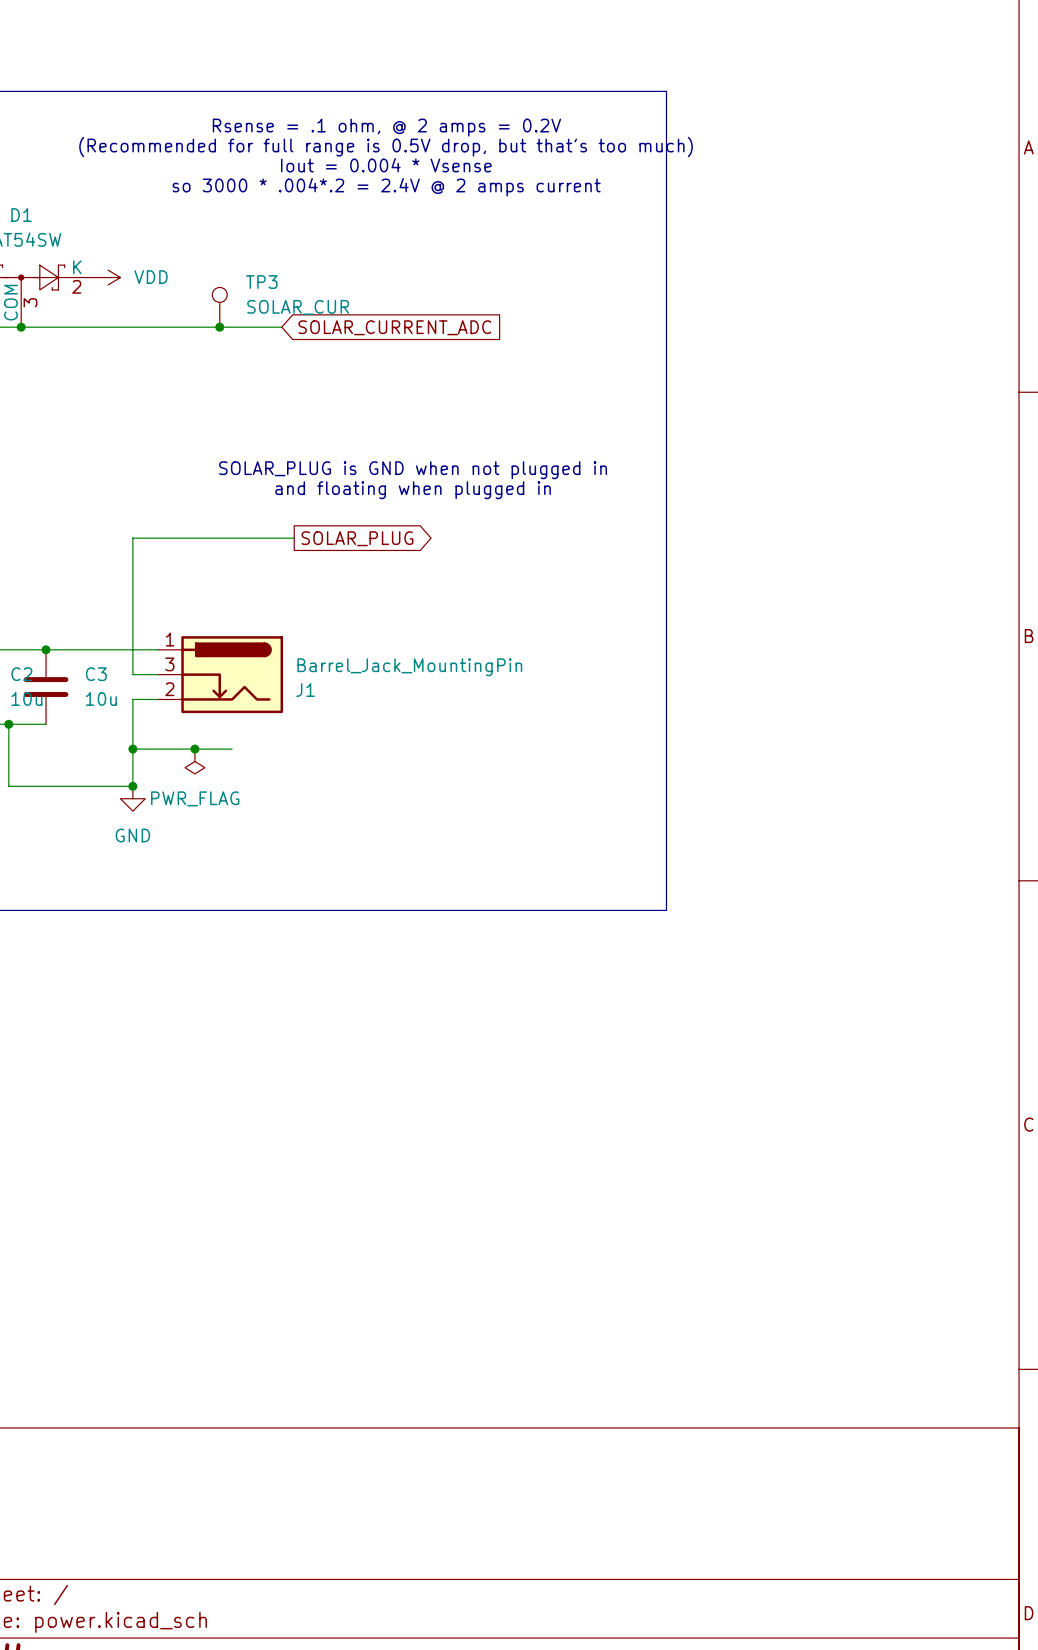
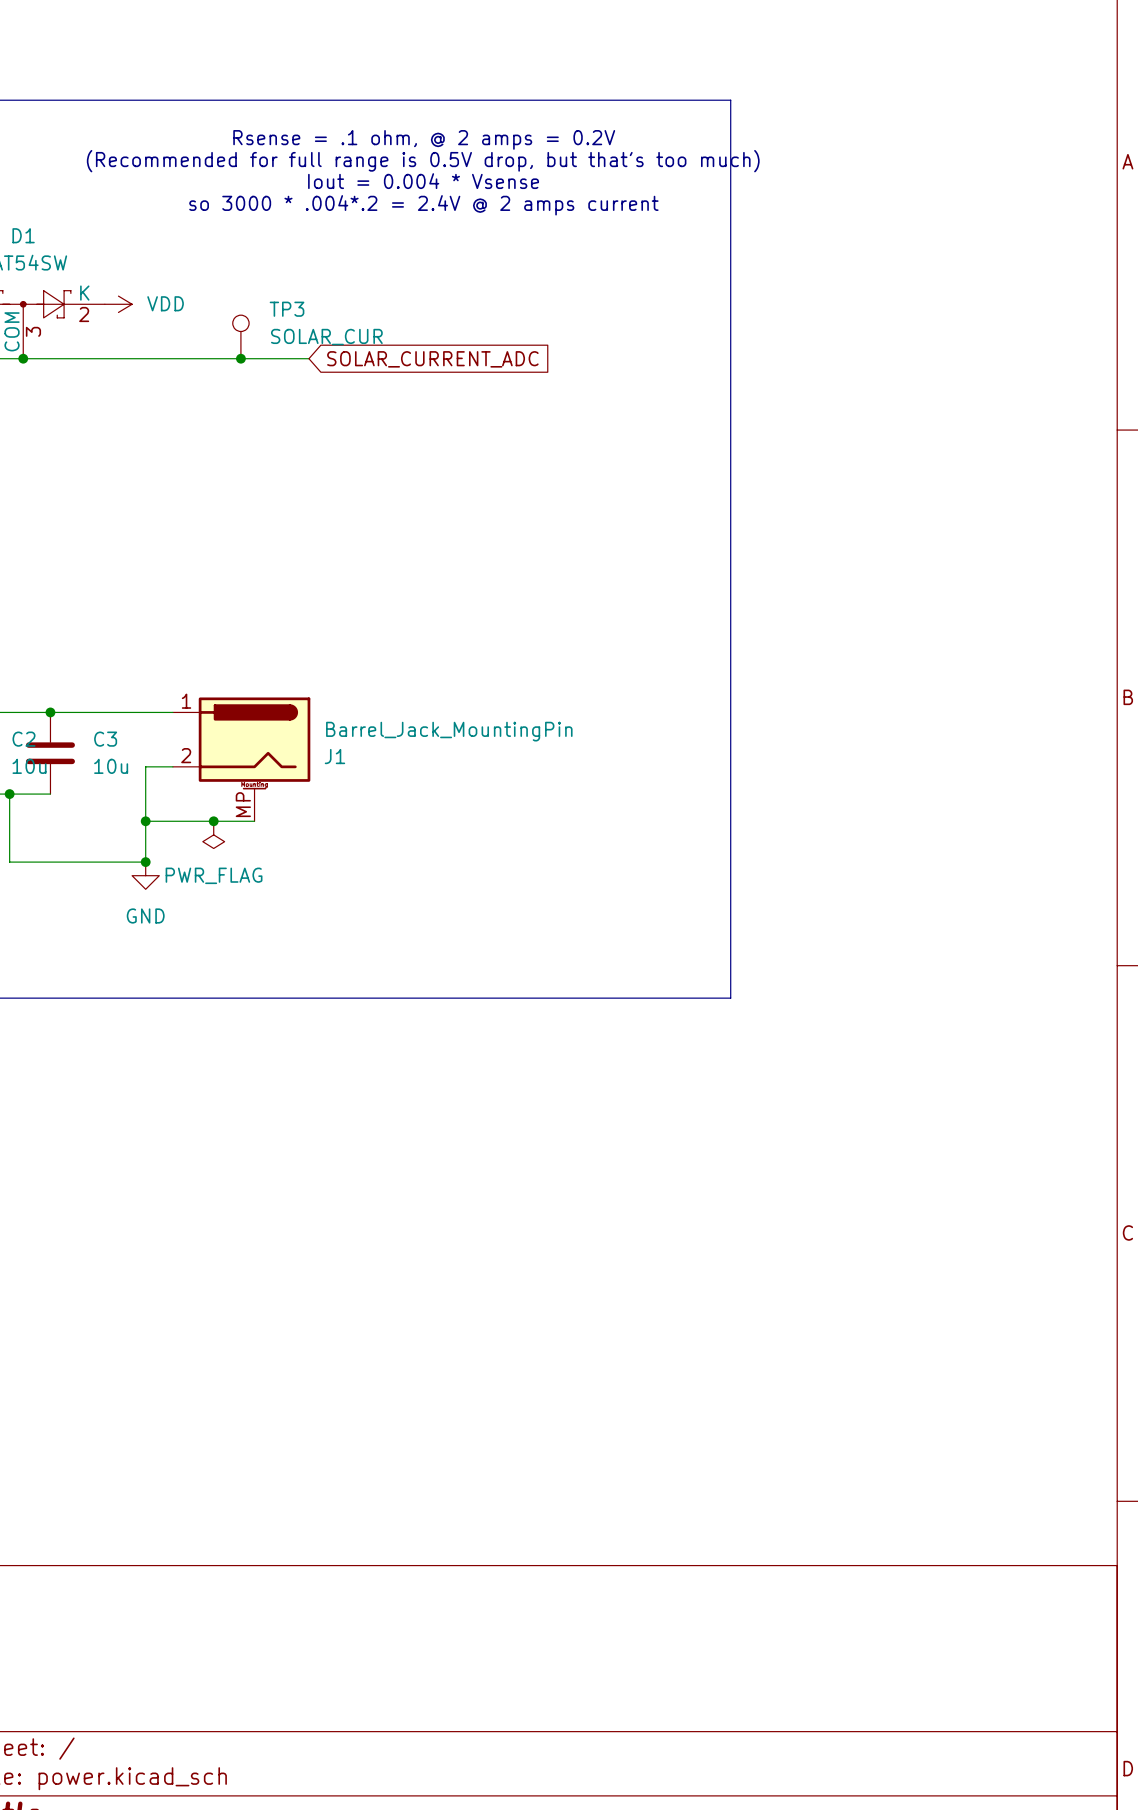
text: SOLAR_PLUG is GND when not plugged in (413, 470) -> none
text: and floating when plugged in (413, 490) -> none
wire: (294, 538) (132, 538) (132, 674) (157, 674) -> none
global label: SOLAR_PLUG (357, 538) -> none
J1 symbol: [157, 636, 284, 714] -> [172, 697, 311, 822]

